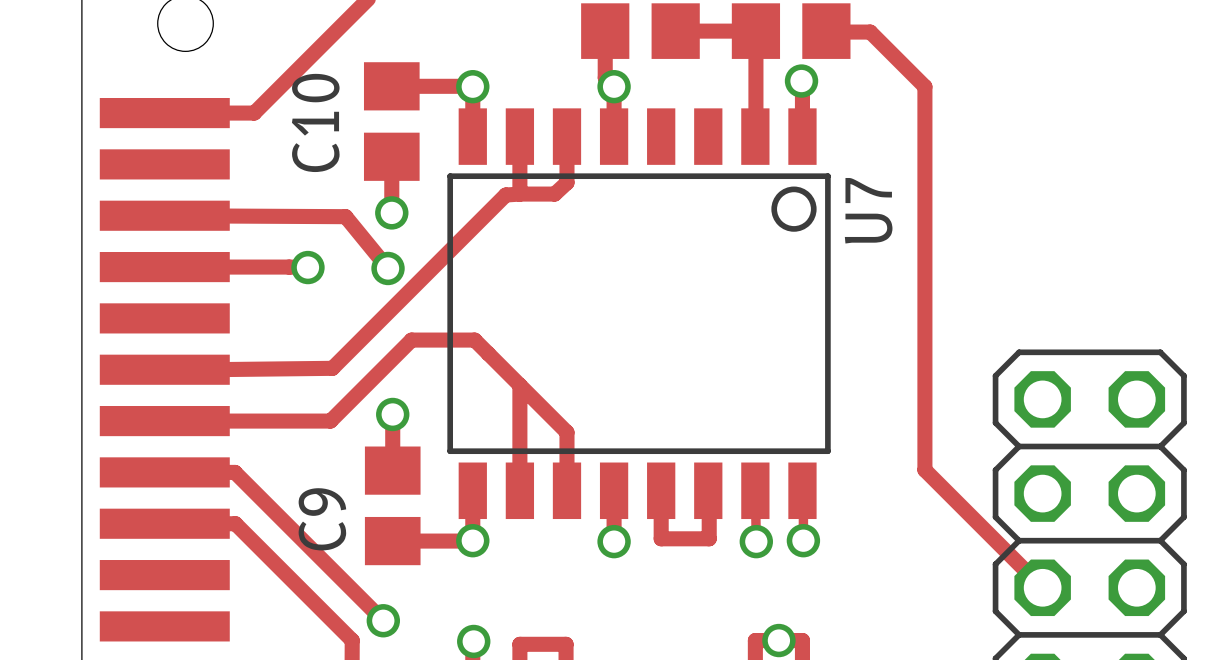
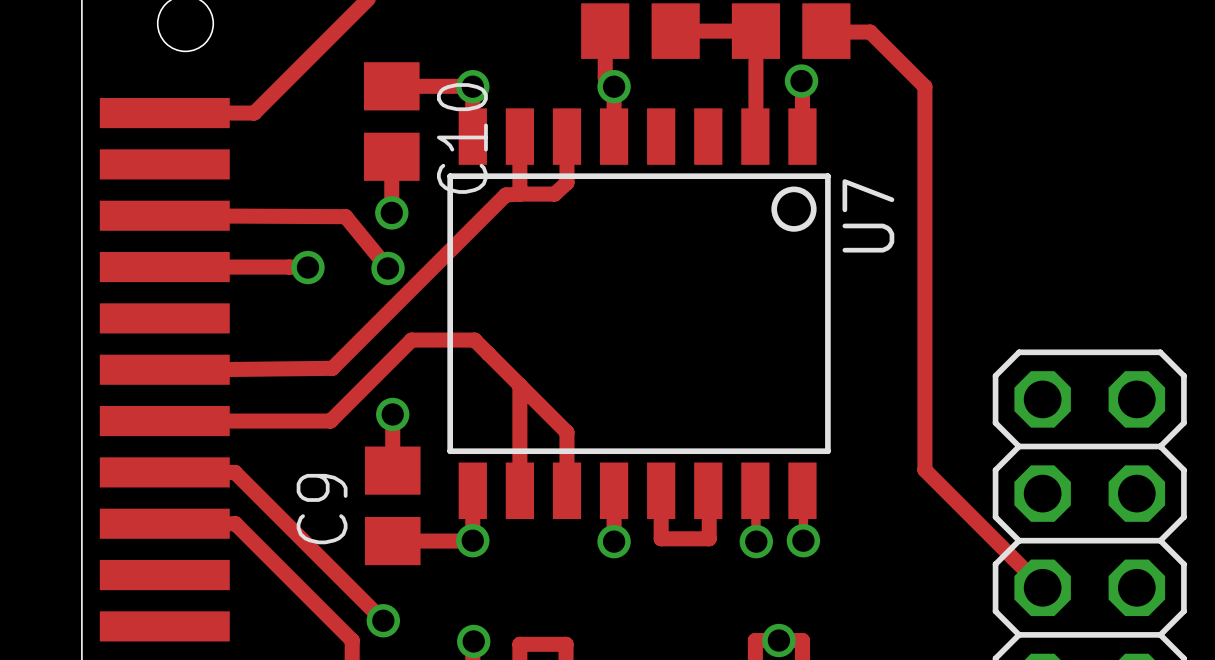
C10 name position: C10 (315, 122) -> C10 (462, 138)

